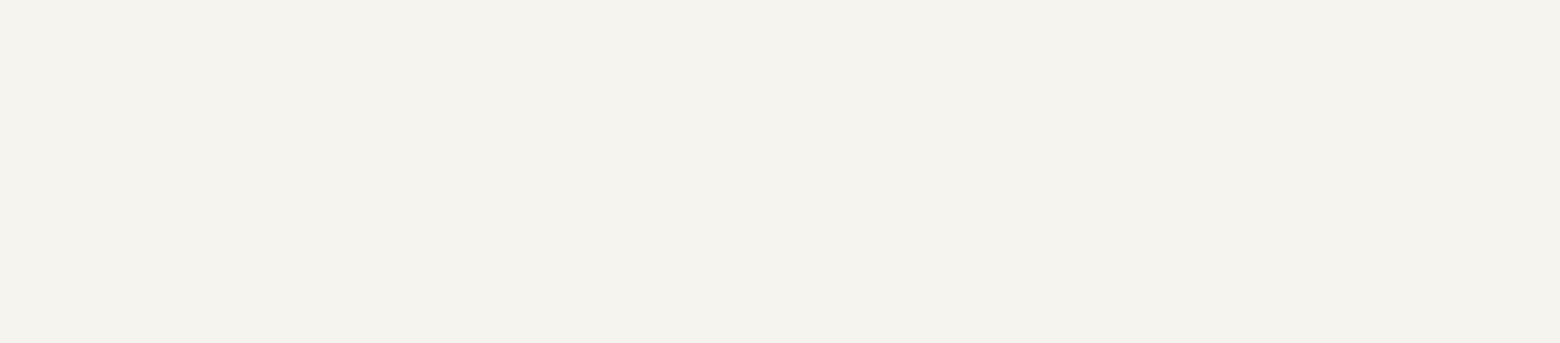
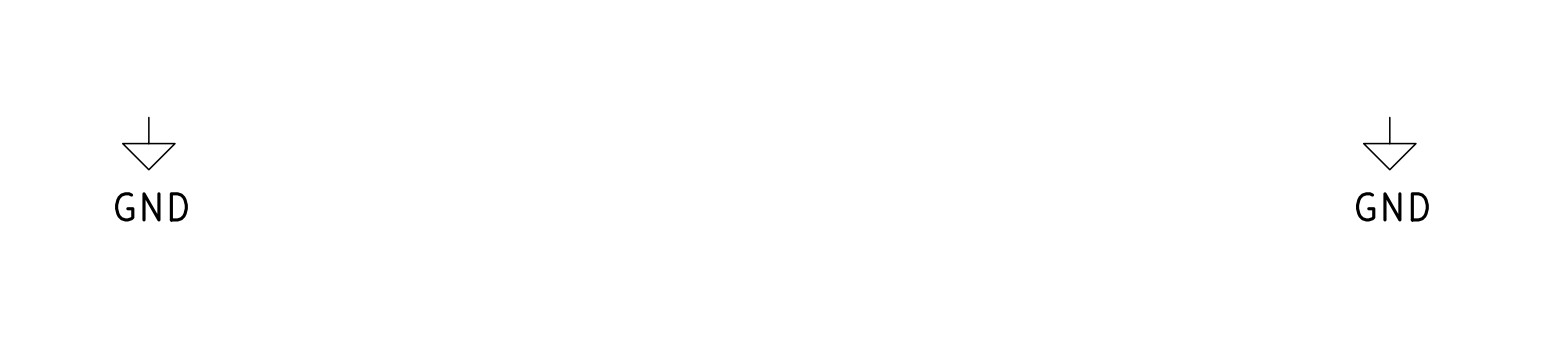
power symbol: none -> GND (148, 143)
power symbol: none -> GND (1389, 143)

